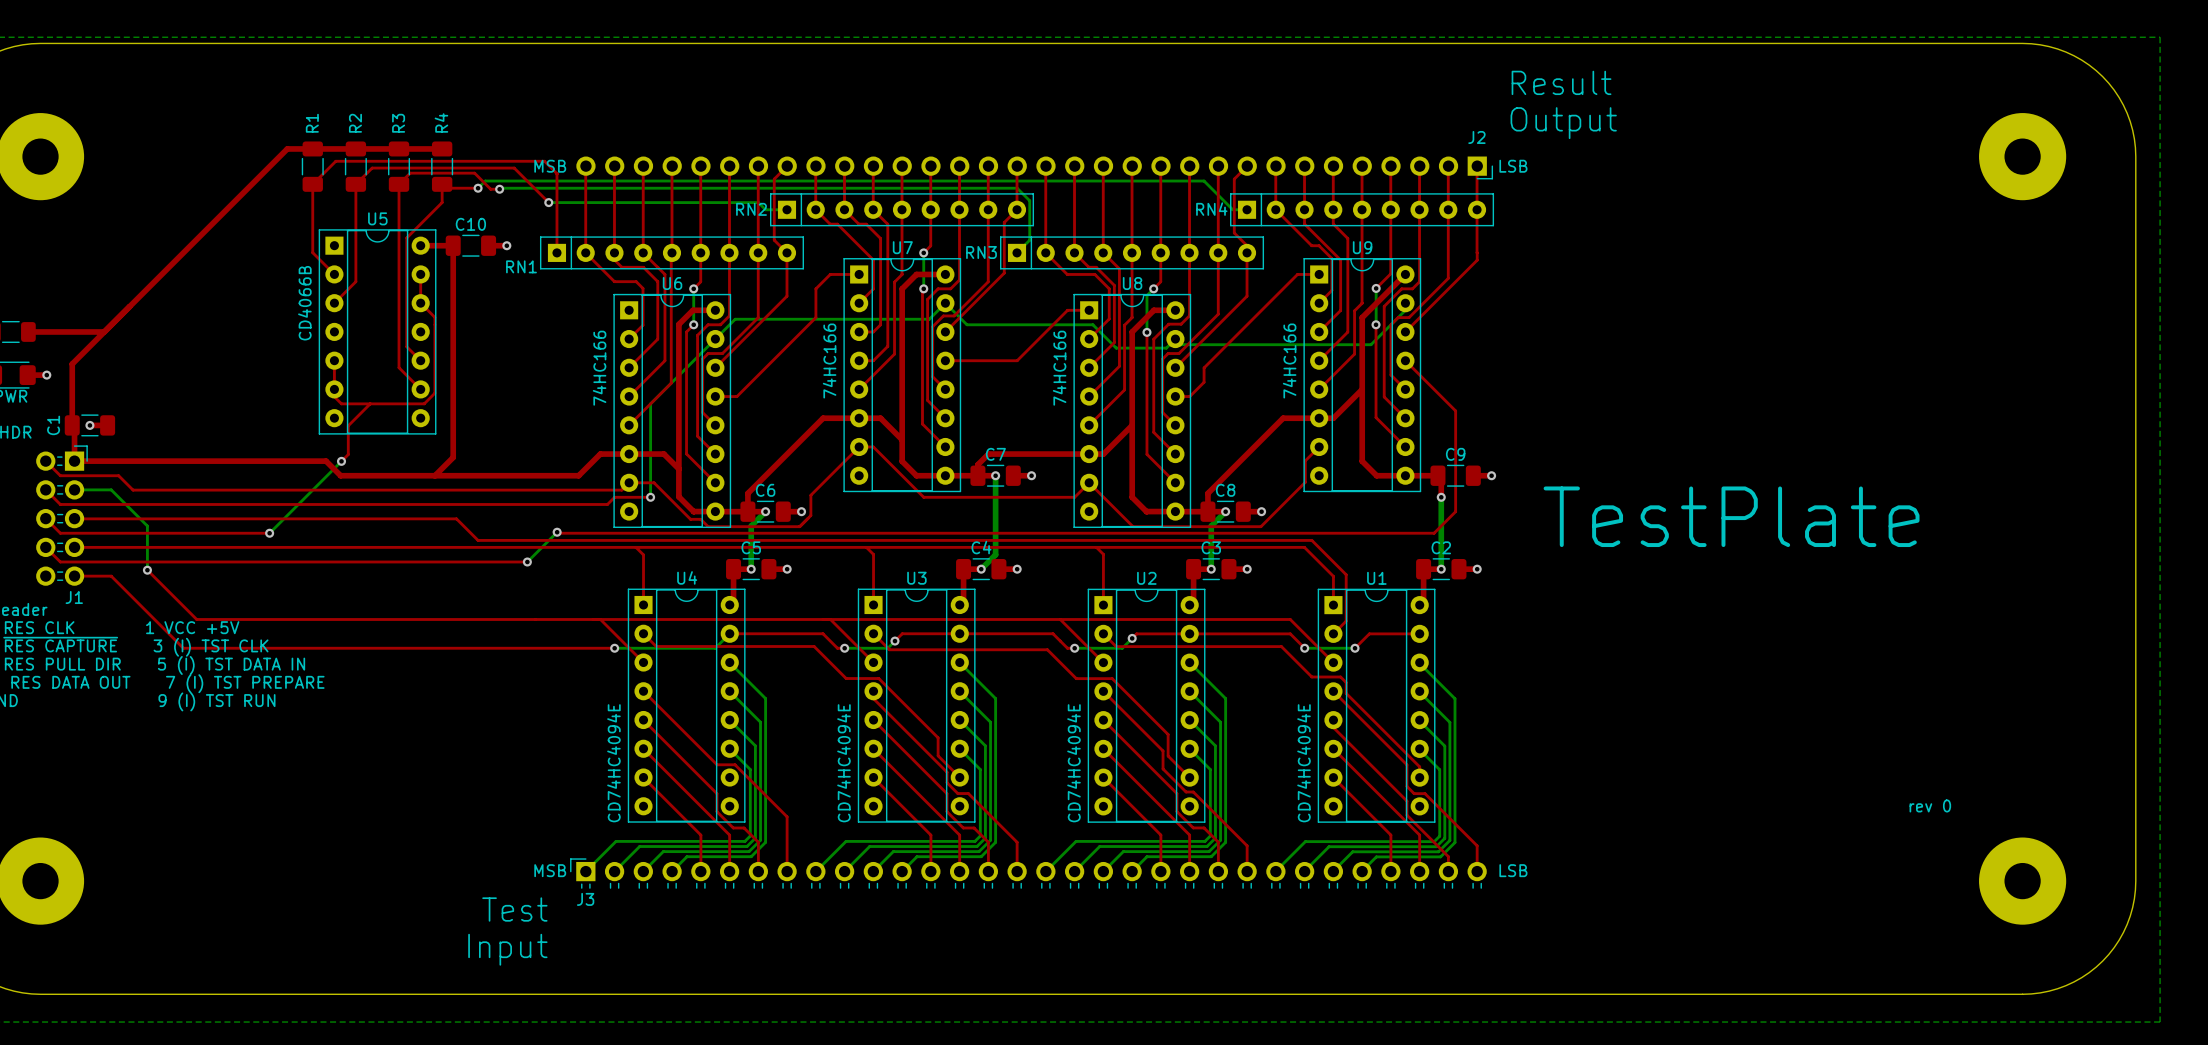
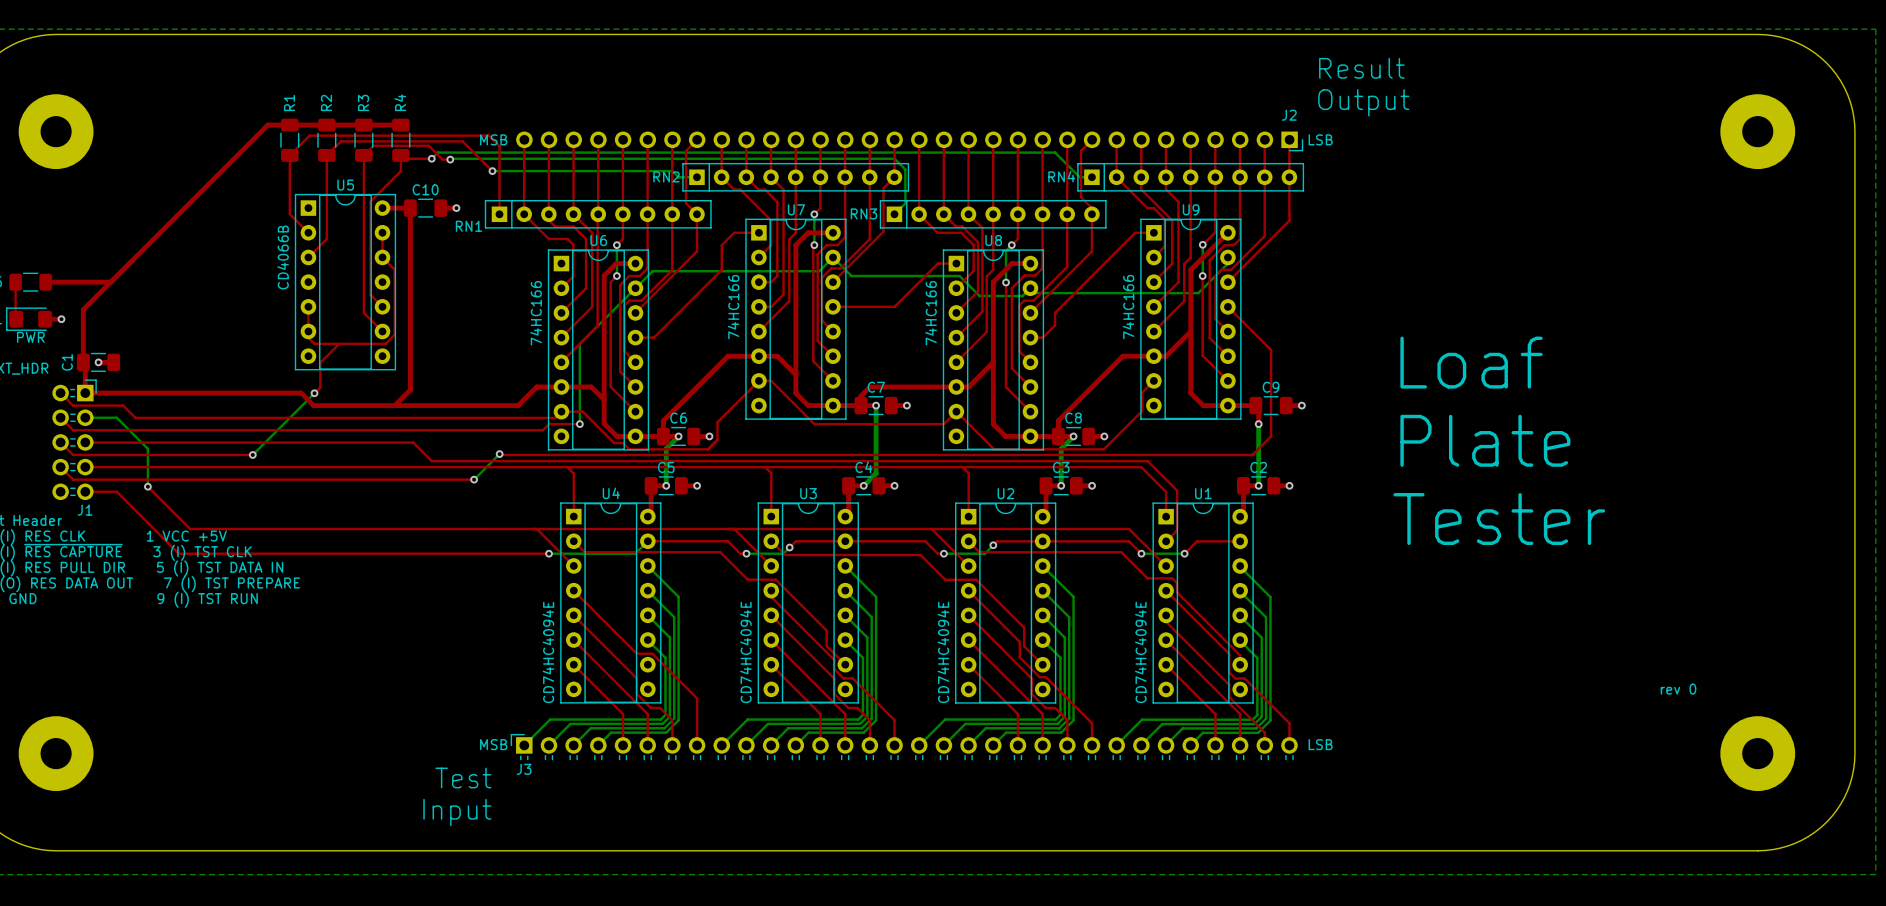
text: none -> Loaf (1471, 362)
text: none -> Plate (1485, 440)
text: TestPlate (1731, 516) -> none
text: none -> Tester (1499, 519)

